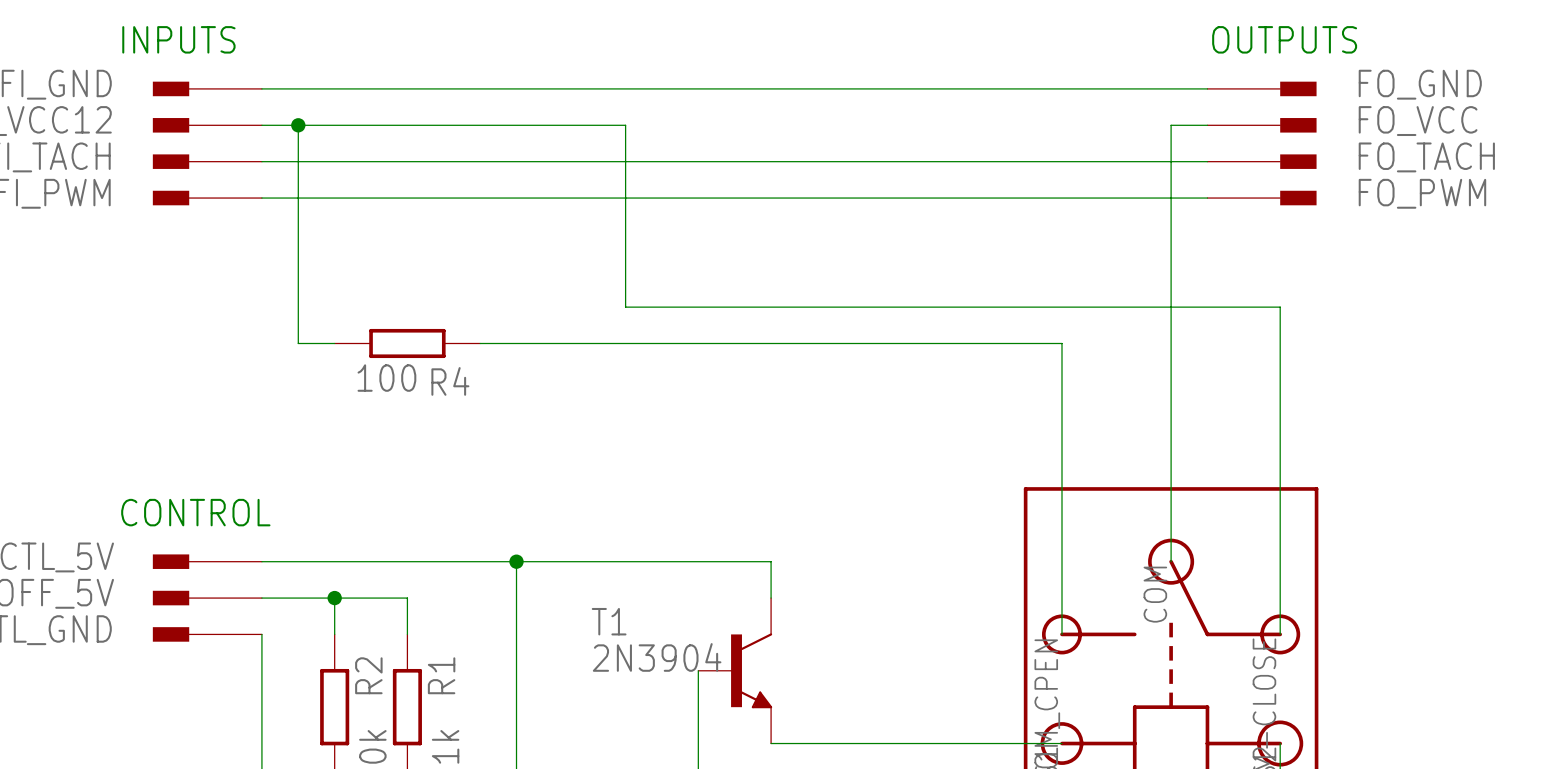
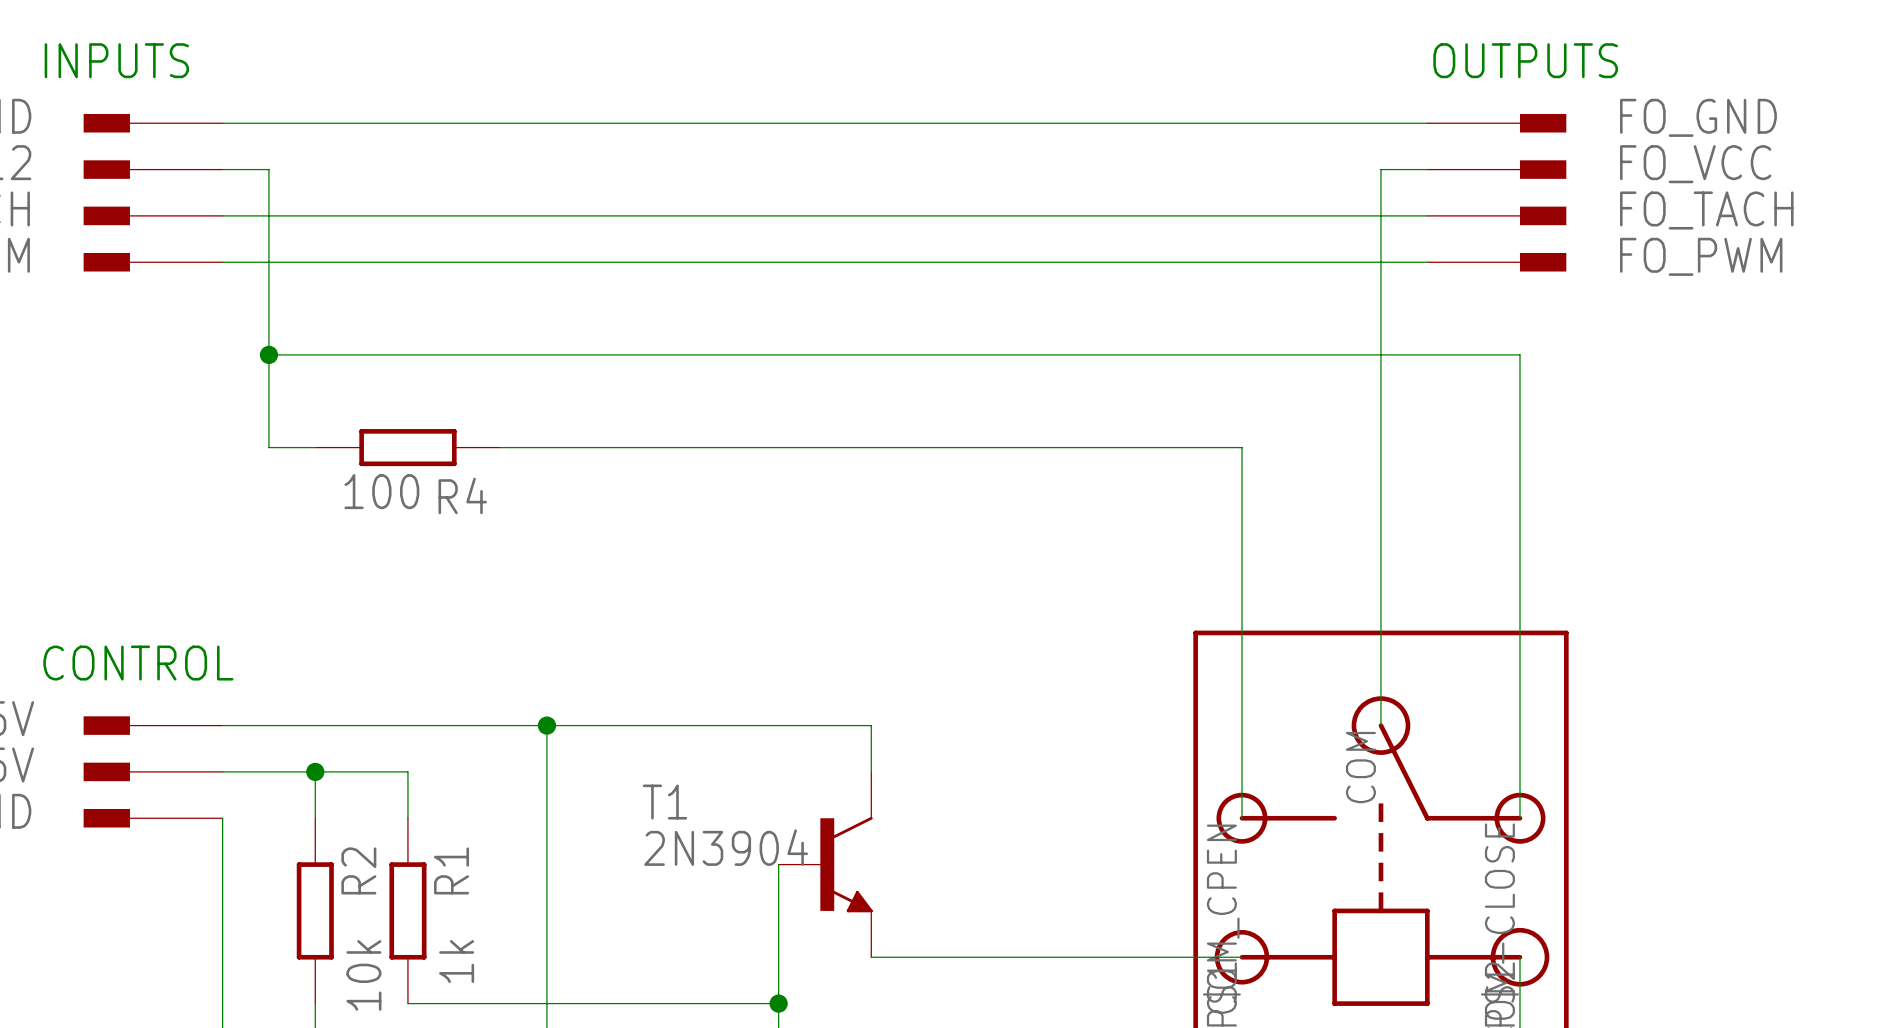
wire: (298, 125) (625, 125) (625, 307) (1280, 307) -> (268, 354) (1519, 354) (1519, 401)
junction: (298, 125) -> none
junction: none -> (268, 354)

